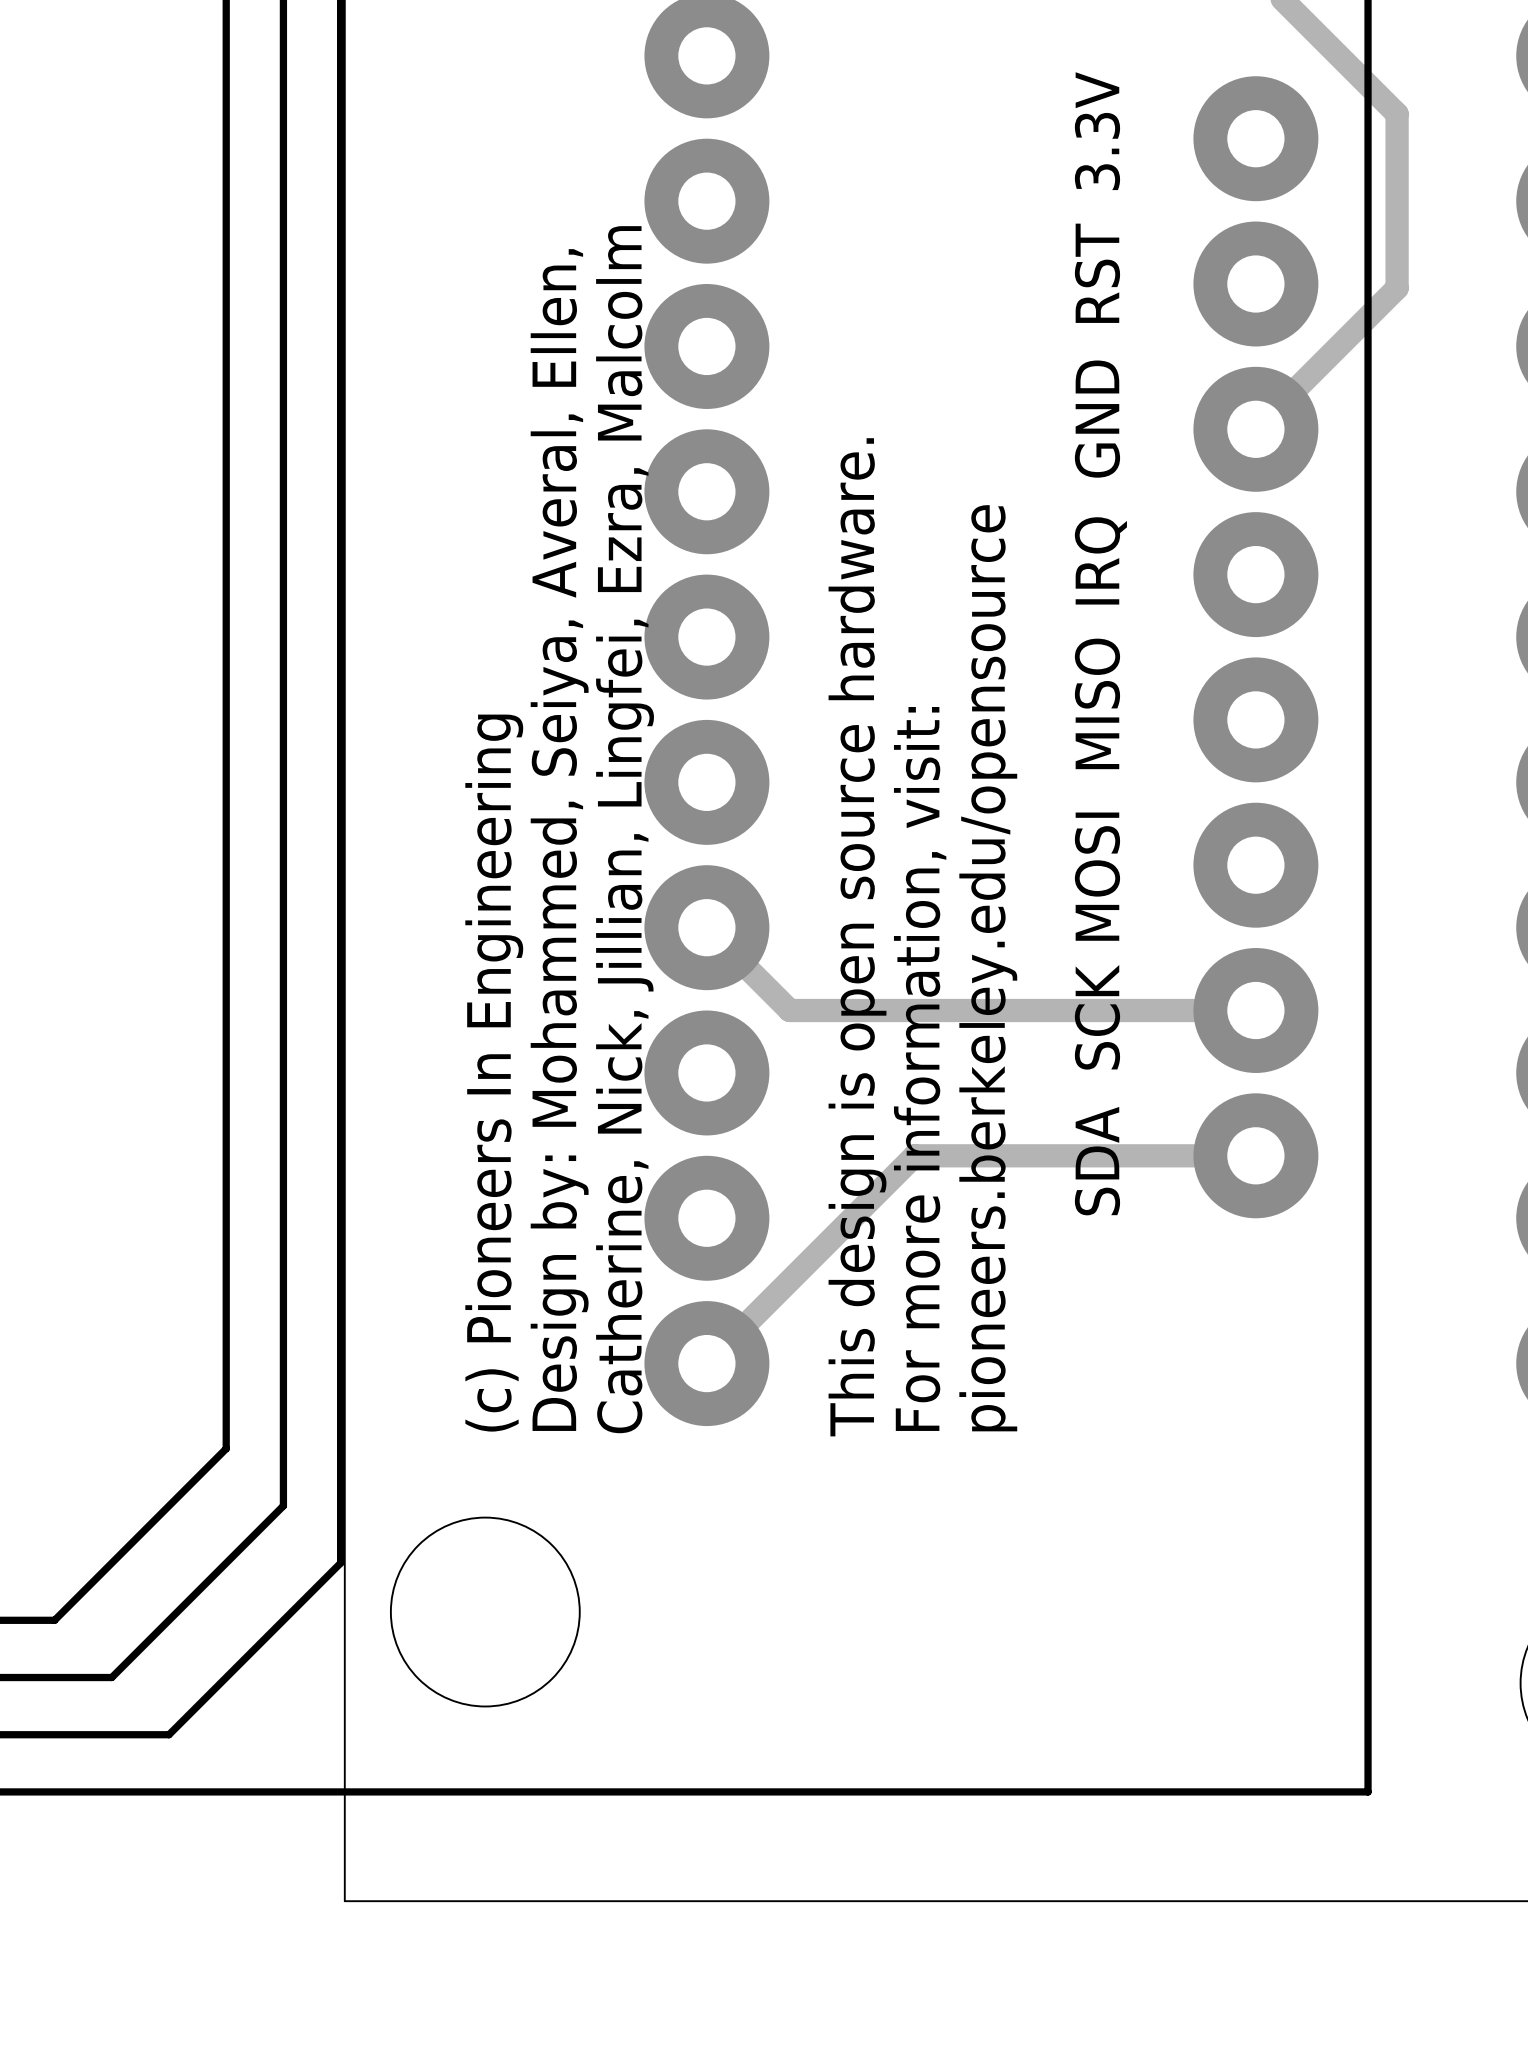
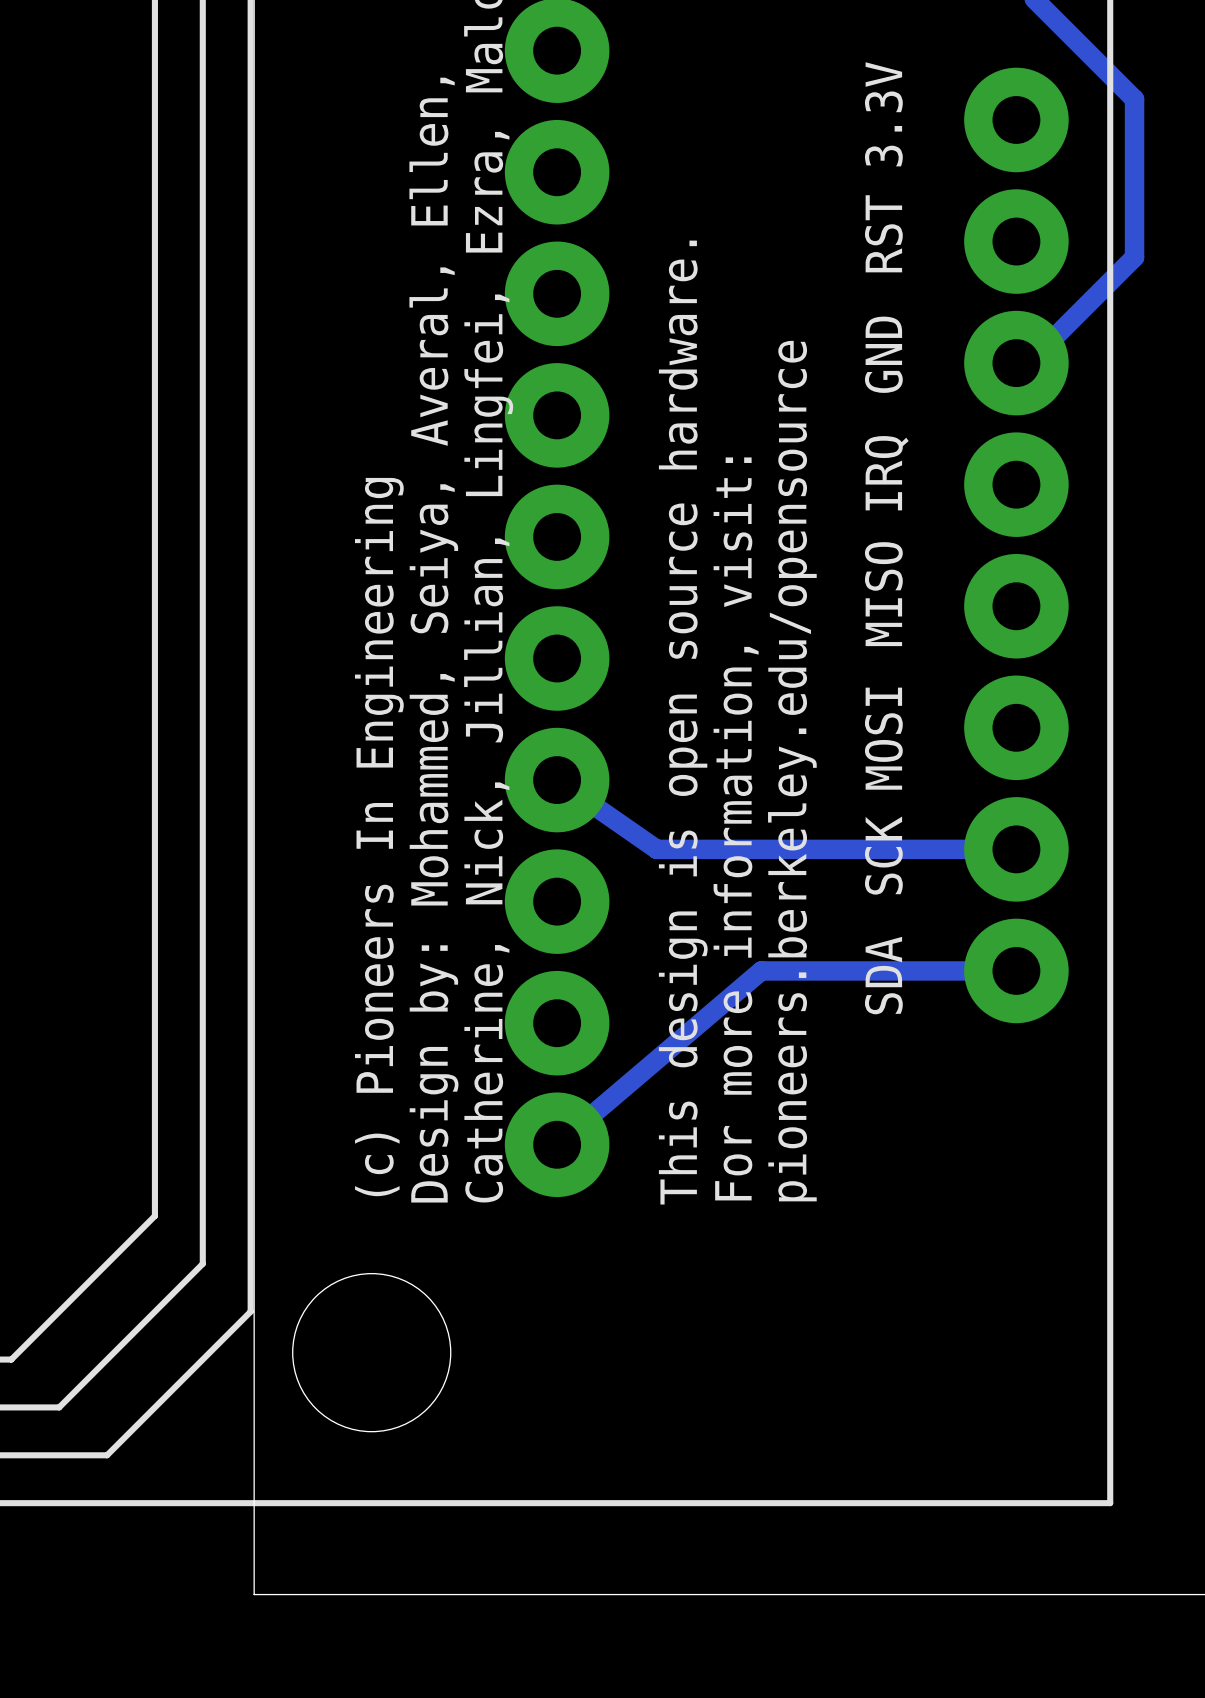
track: (1397, 288) (1255, 429) -> (1134, 244) (1134, 257) (1040, 351) (1040, 363)
track: (706, 927) (789, 1010) (826, 1010) -> (557, 780) (656, 849)
track: (951, 1155) (914, 1155) (706, 1363) -> (761, 970) (557, 1144)

